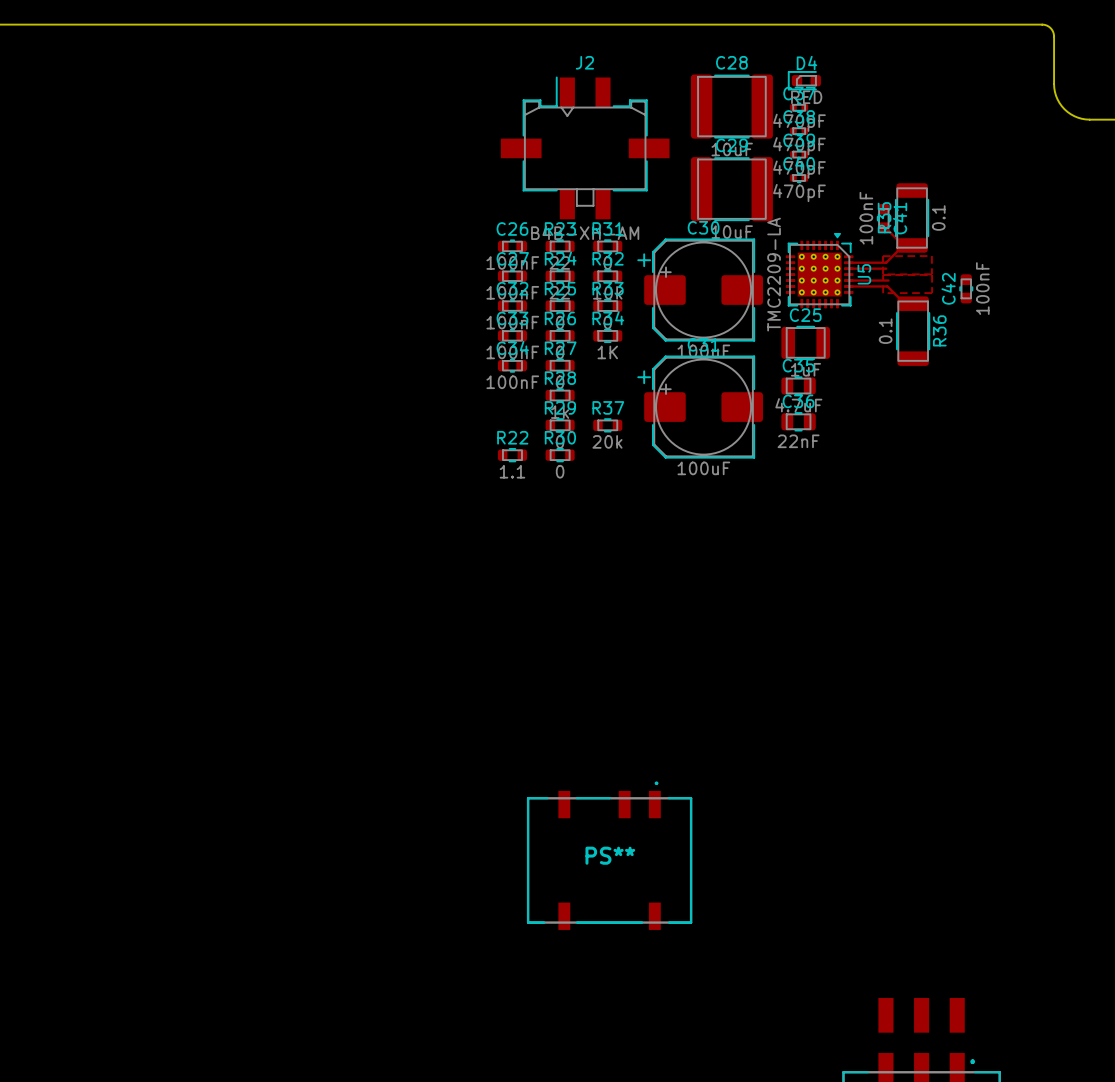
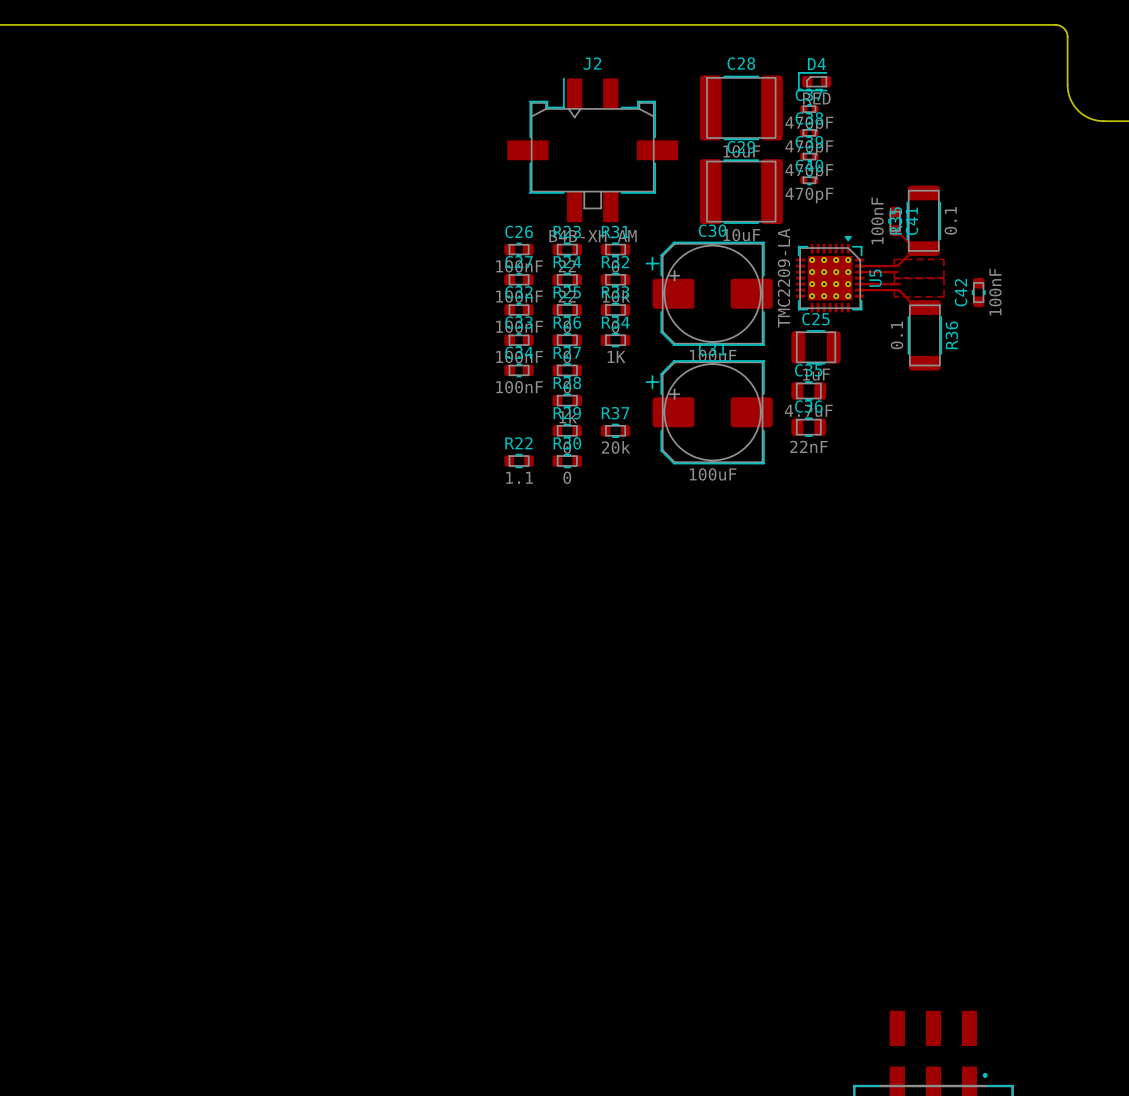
PS**: (609, 855) -> none

